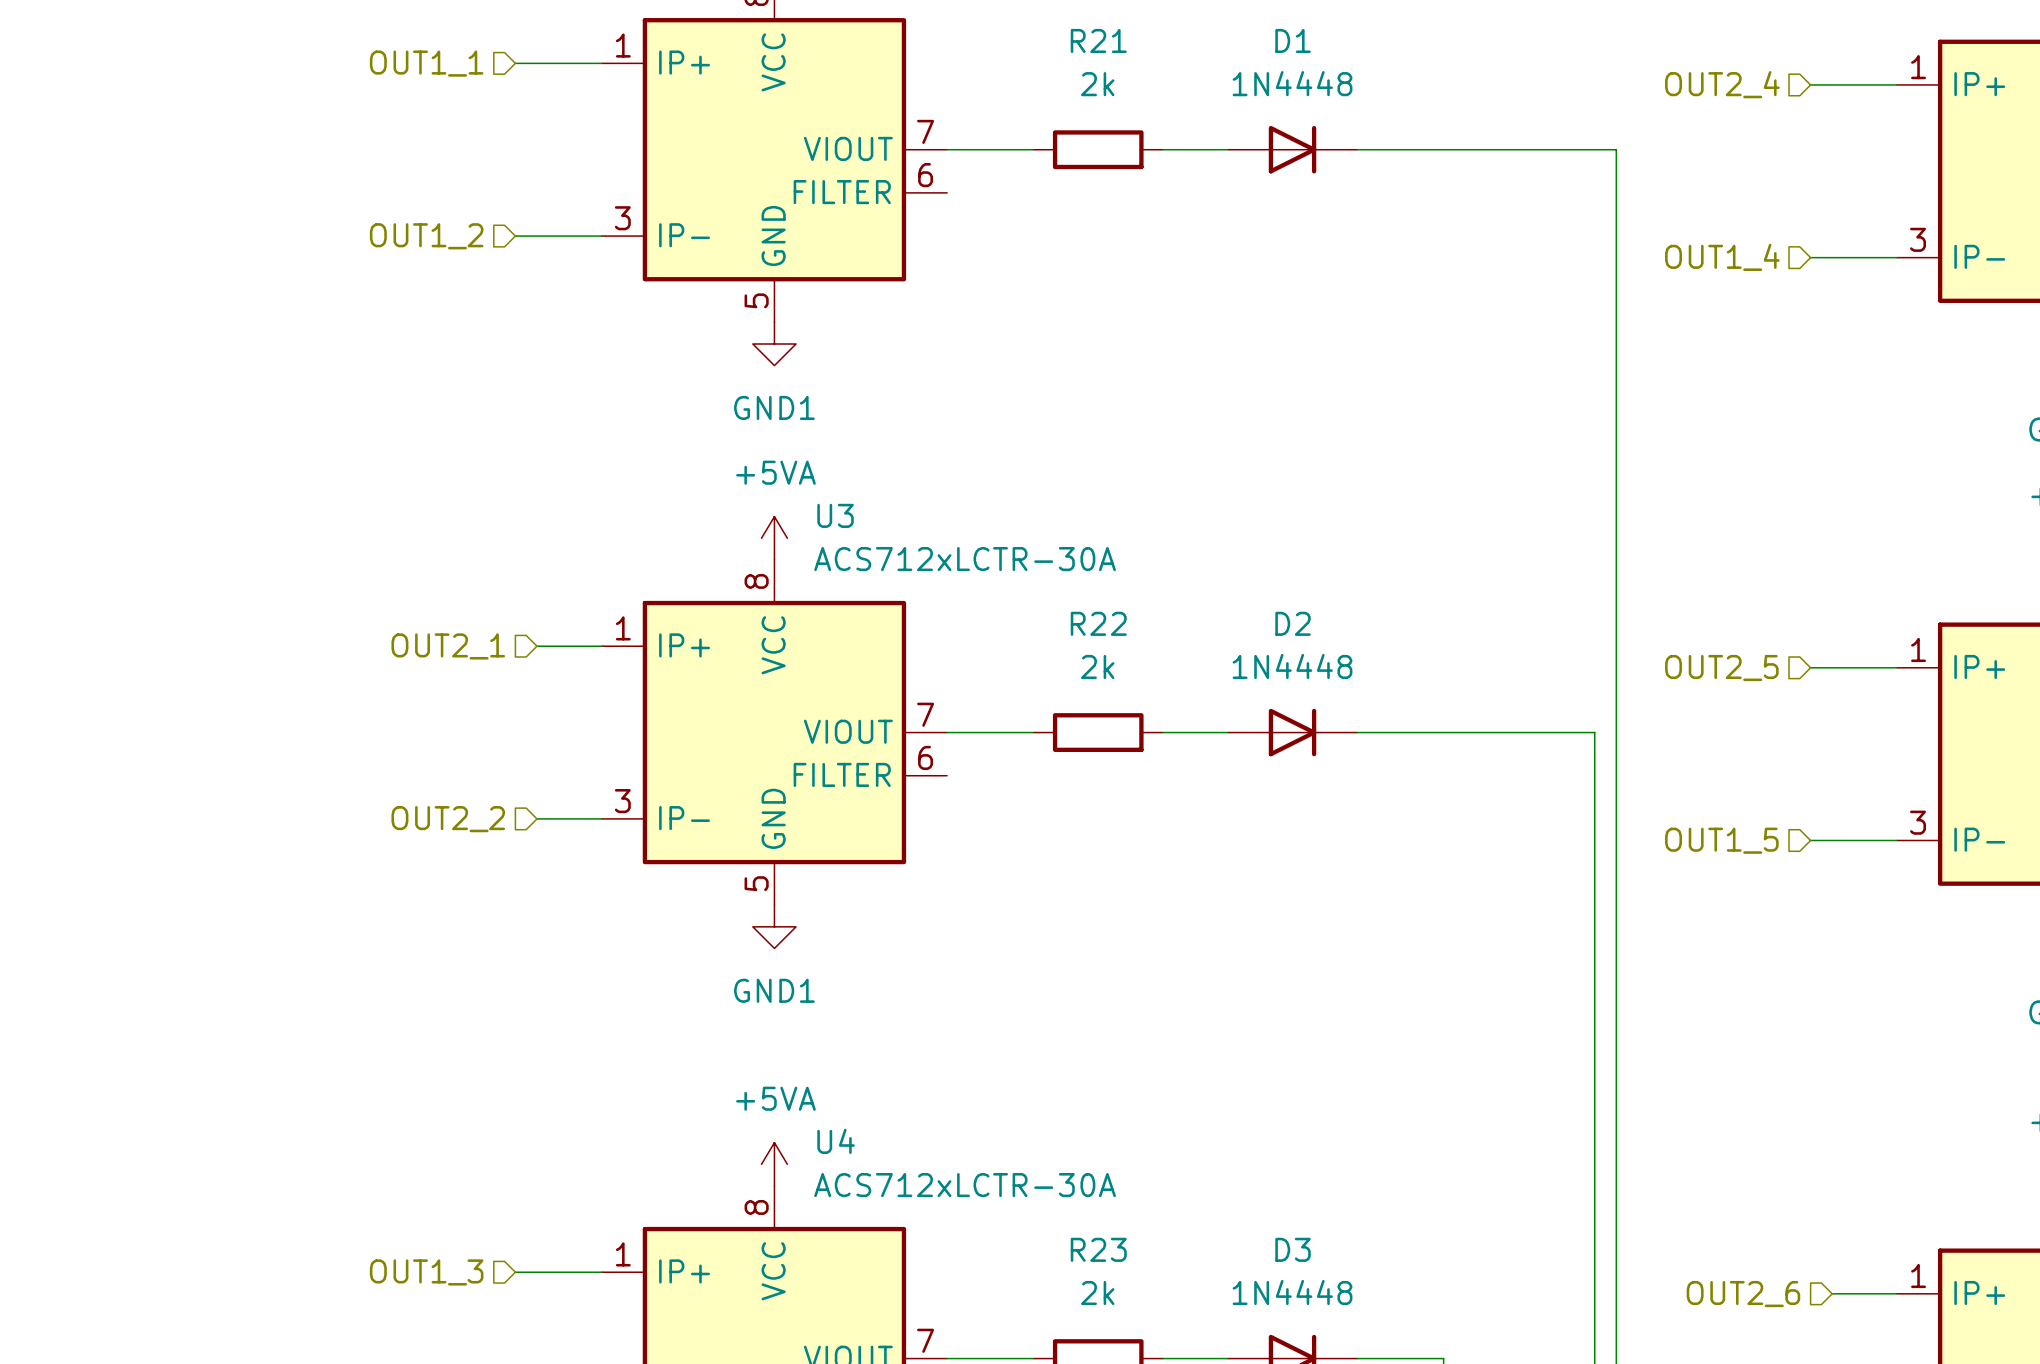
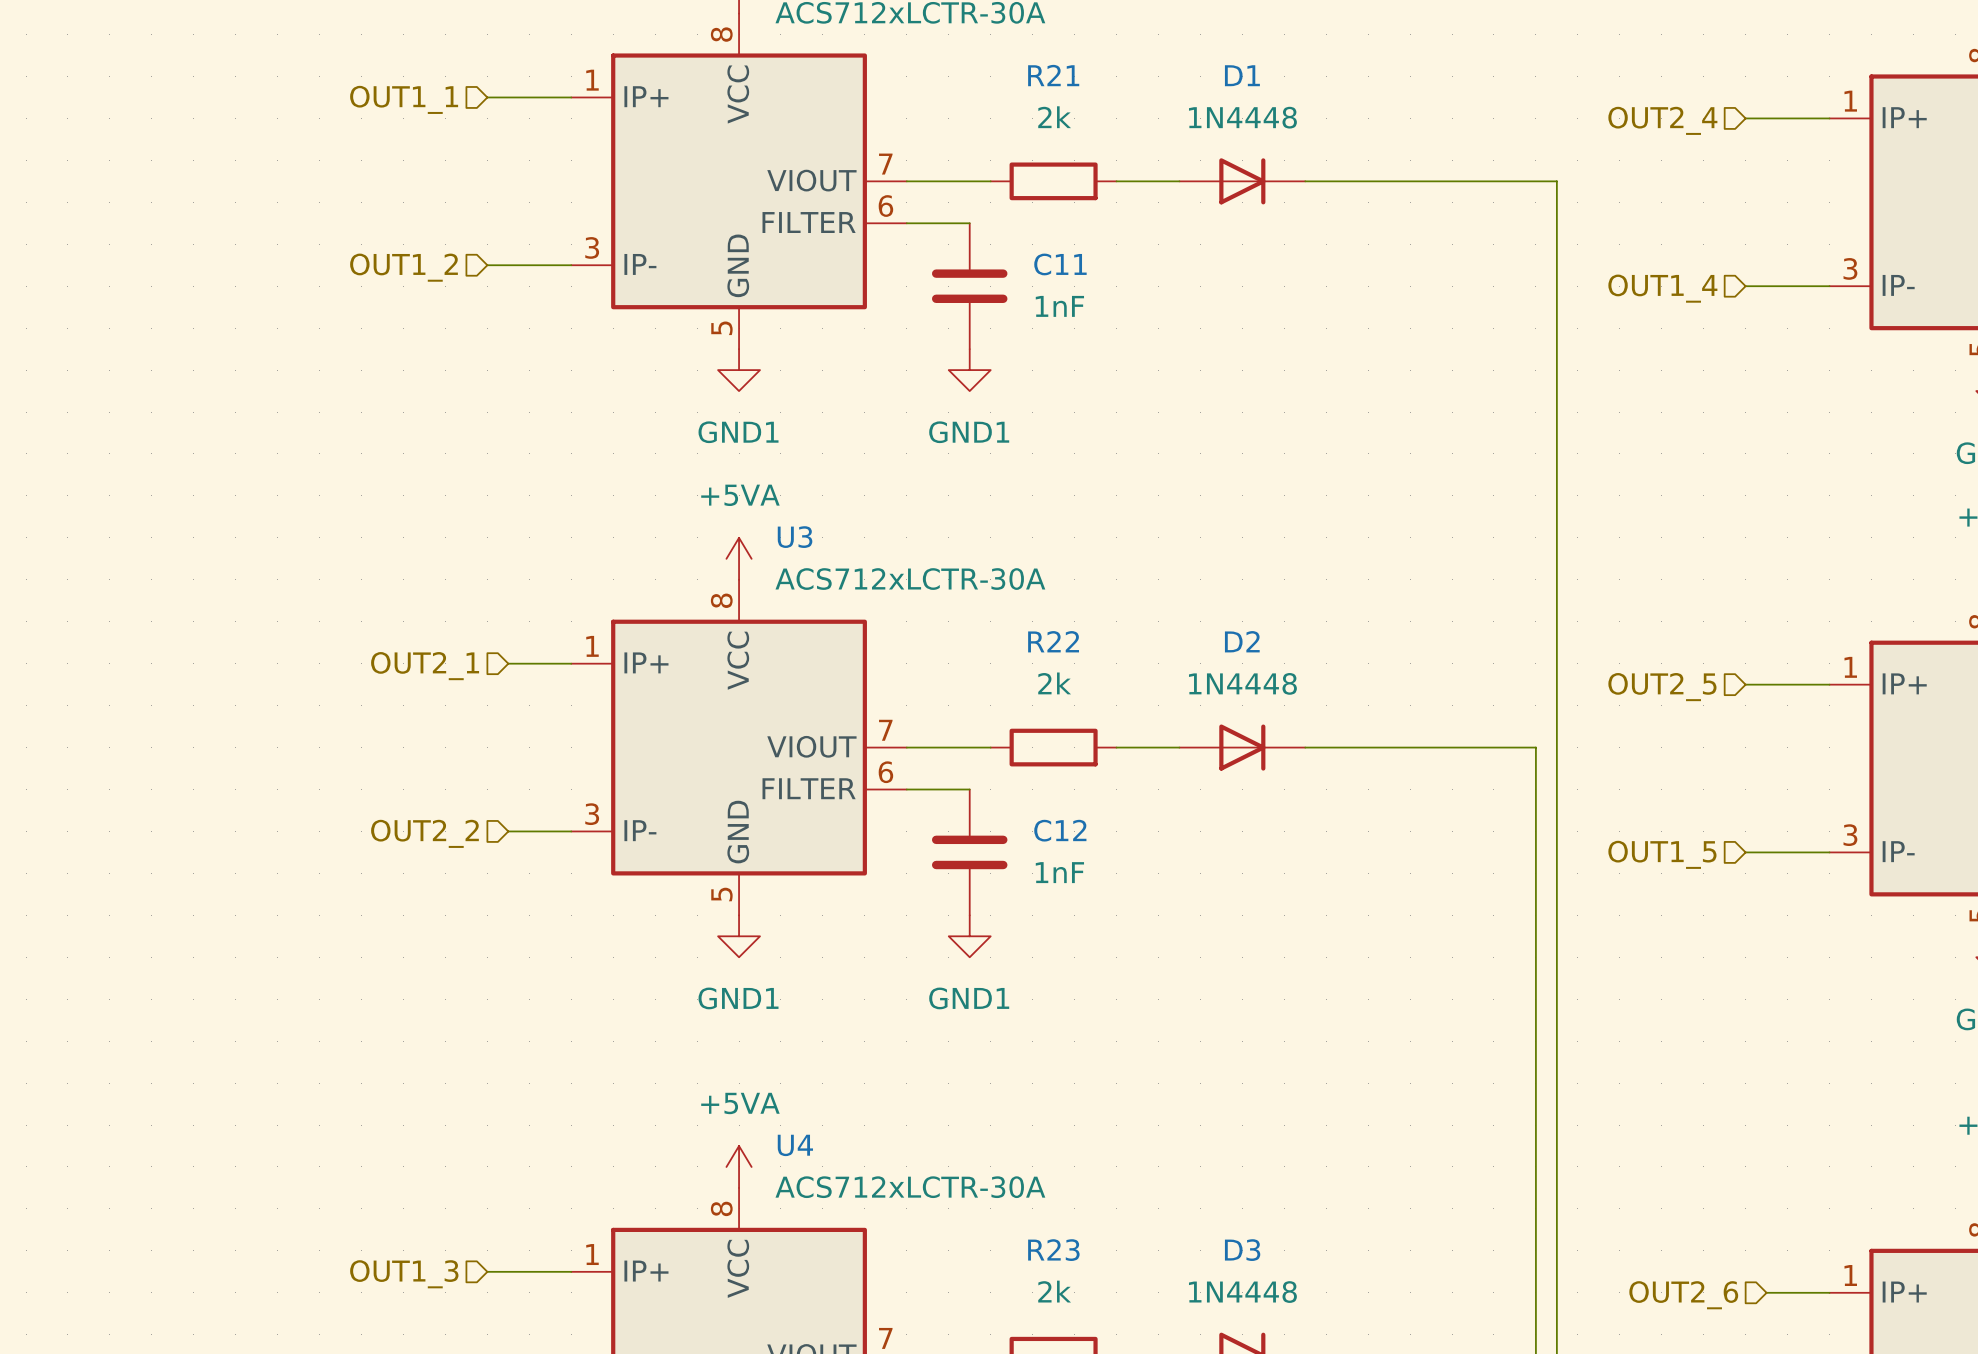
wire: none -> (906, 223) (969, 223)
C11: none -> 1nF (969, 286)
power symbol: none -> GND1 (969, 370)
wire: none -> (906, 789) (969, 789)
C12: none -> 1nF (969, 852)
power symbol: none -> GND1 (969, 936)

